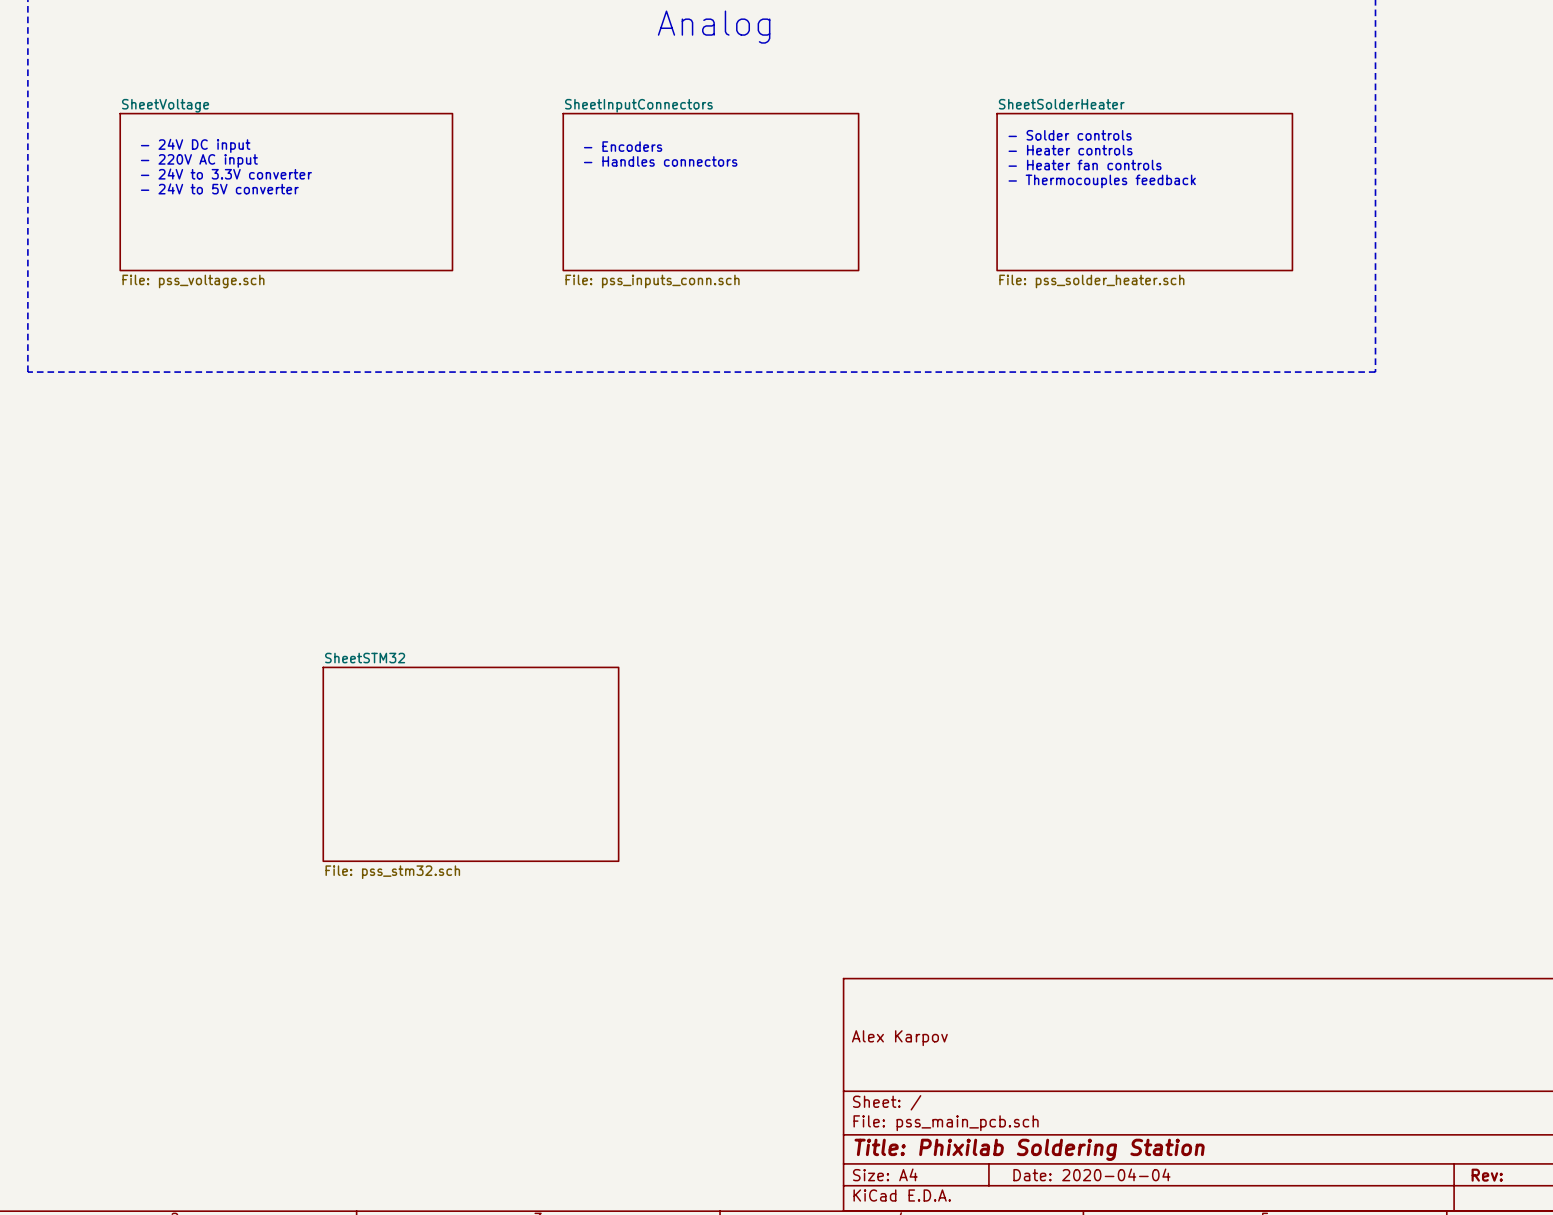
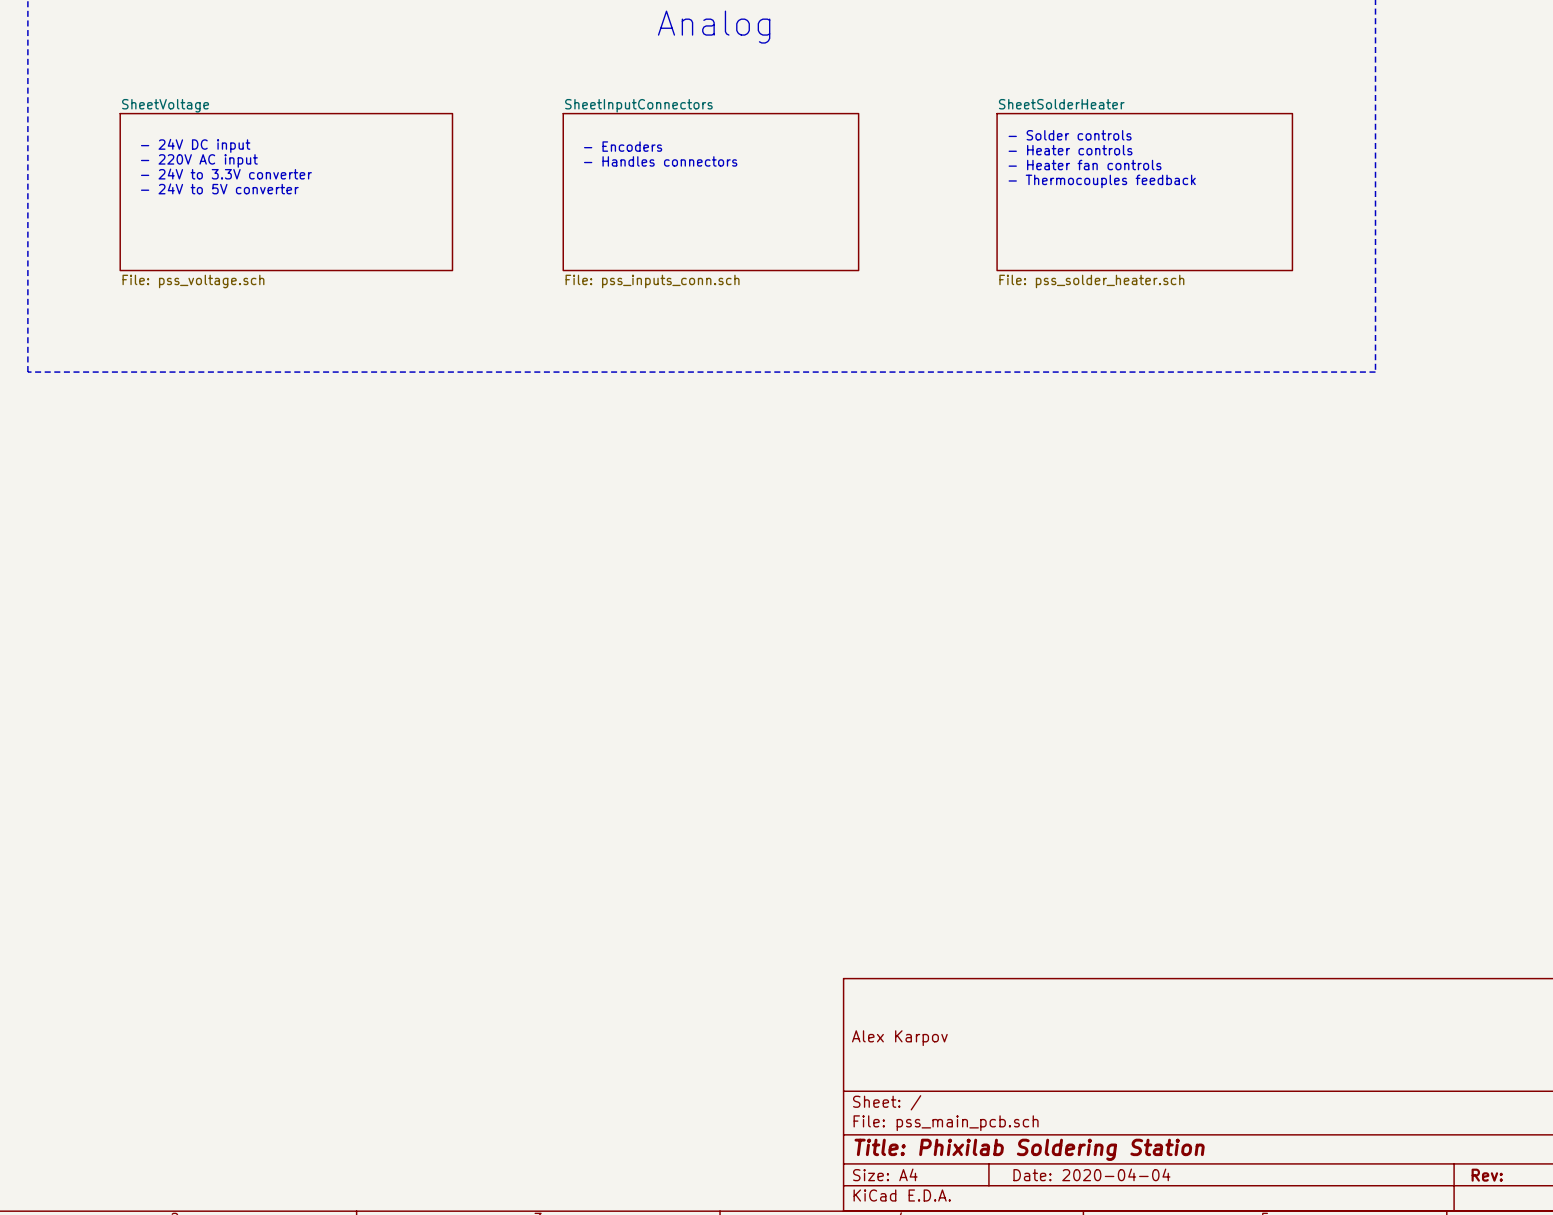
sheet SheetSTM32: File: pss_stm32.sch (470, 764) -> none

